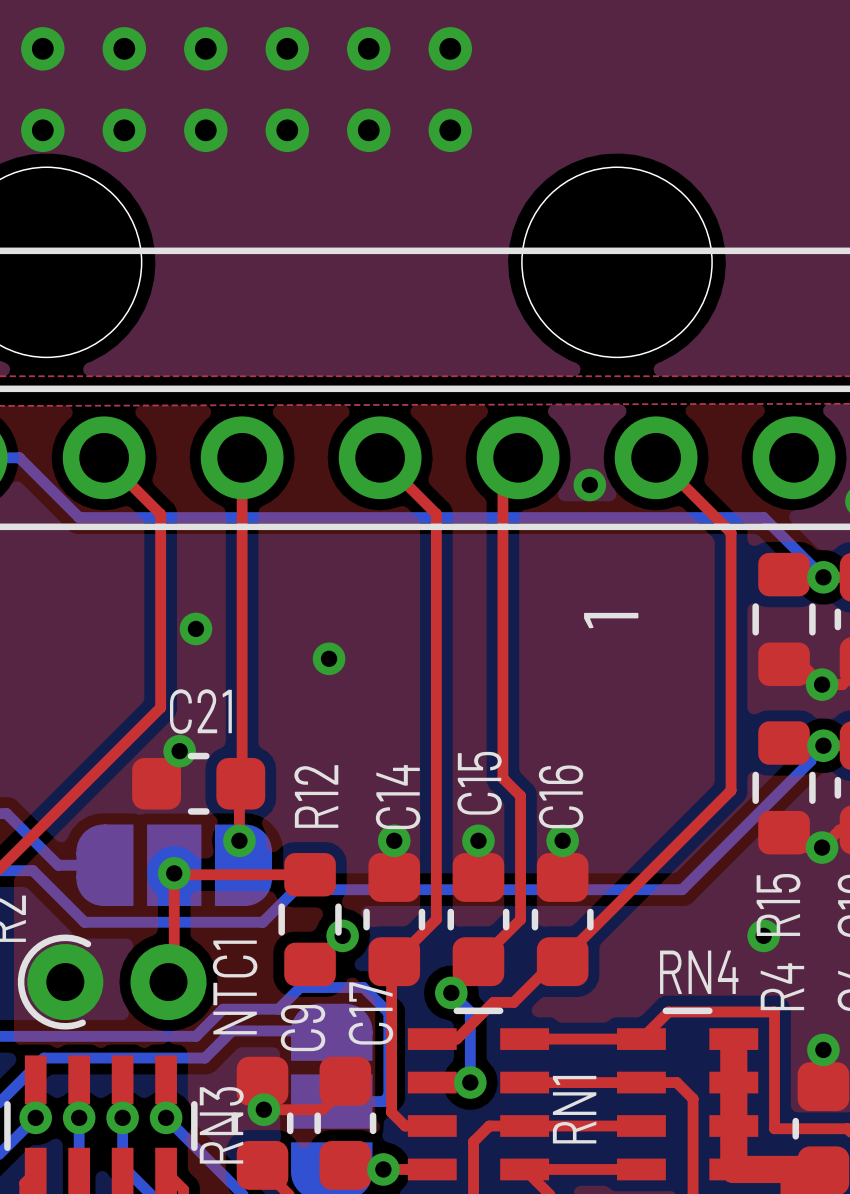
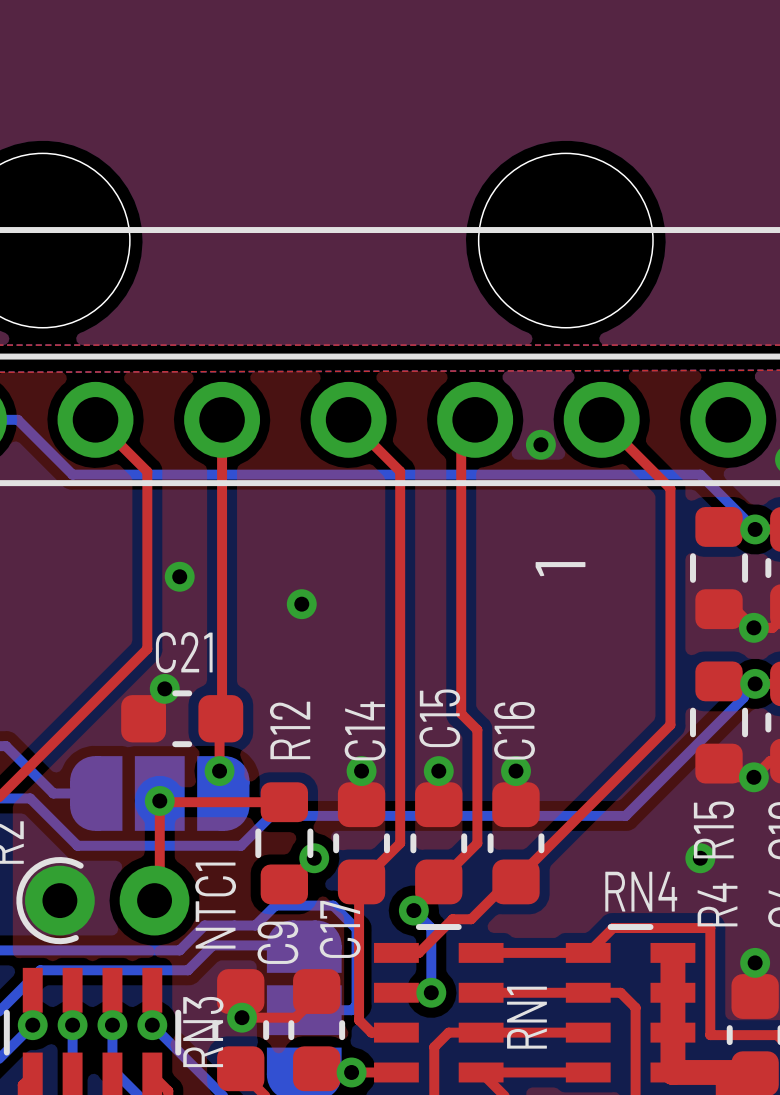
via: (42, 48) -> none
via: (124, 48) -> none
via: (205, 48) -> none
via: (287, 48) -> none
via: (368, 48) -> none
via: (450, 48) -> none
via: (42, 130) -> none
via: (124, 130) -> none
via: (205, 130) -> none
via: (287, 130) -> none
via: (368, 130) -> none
via: (450, 130) -> none

